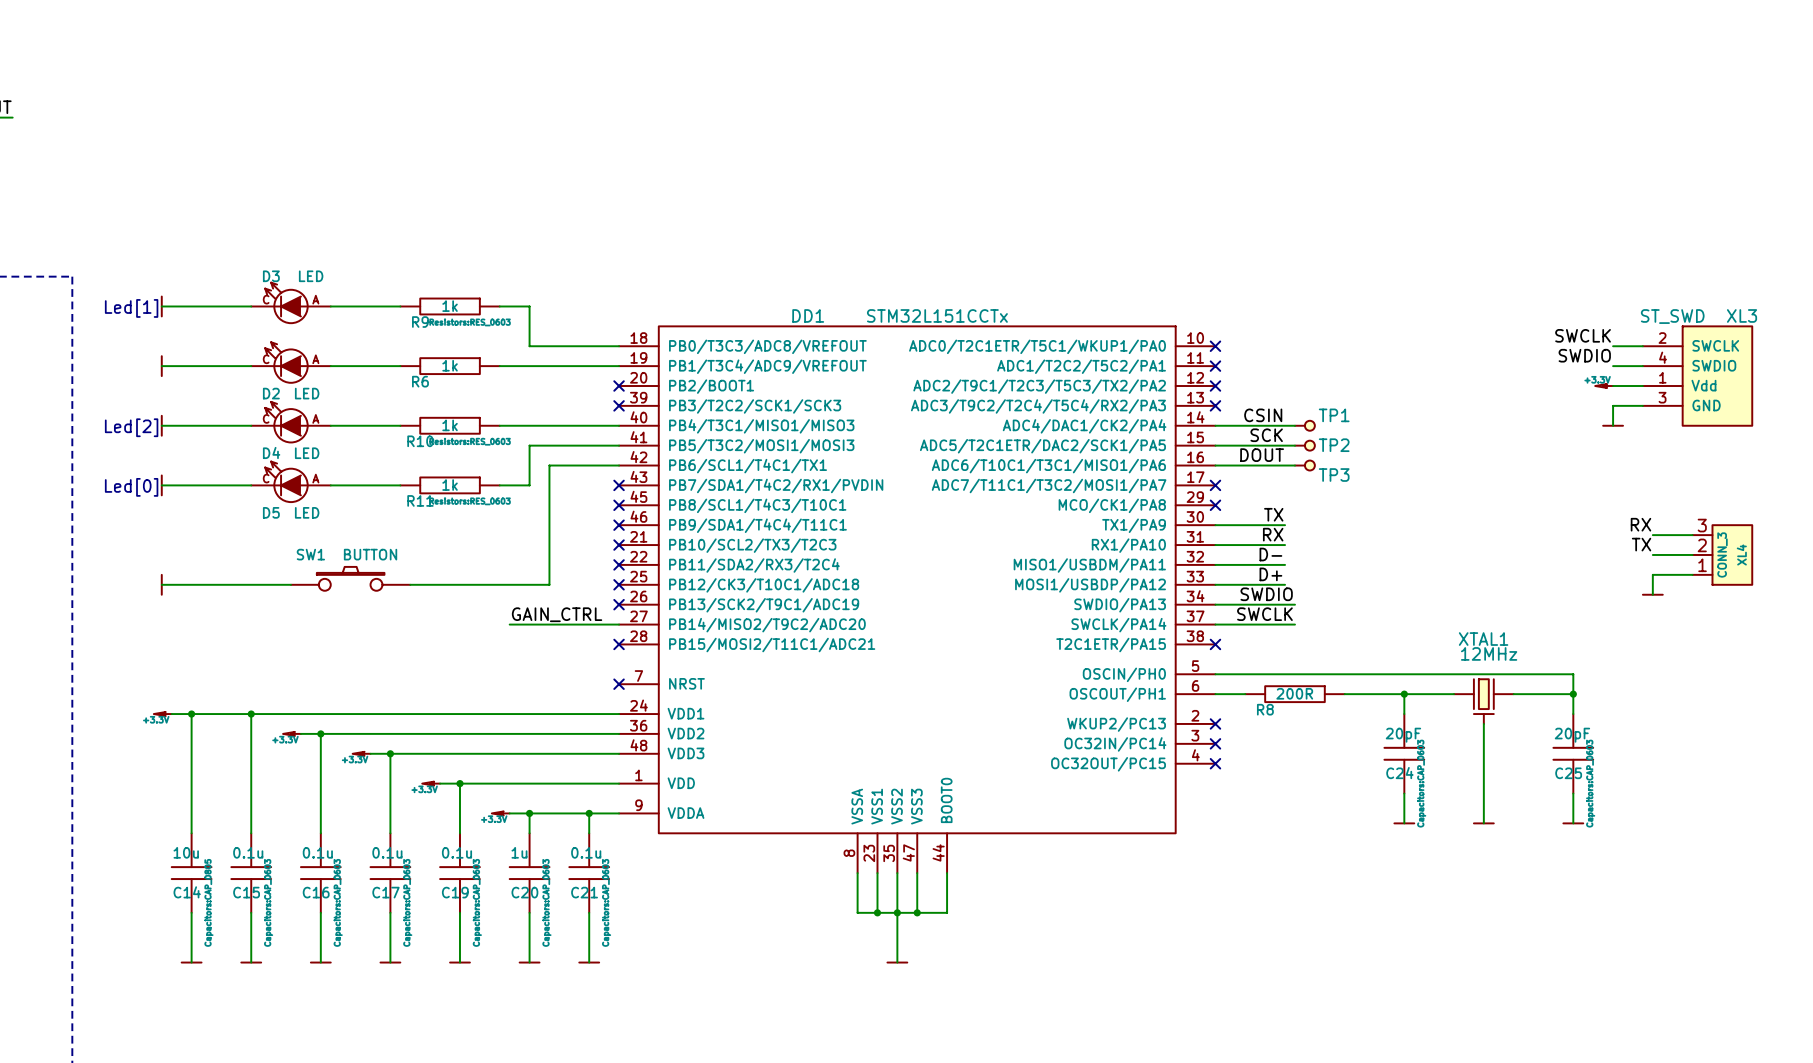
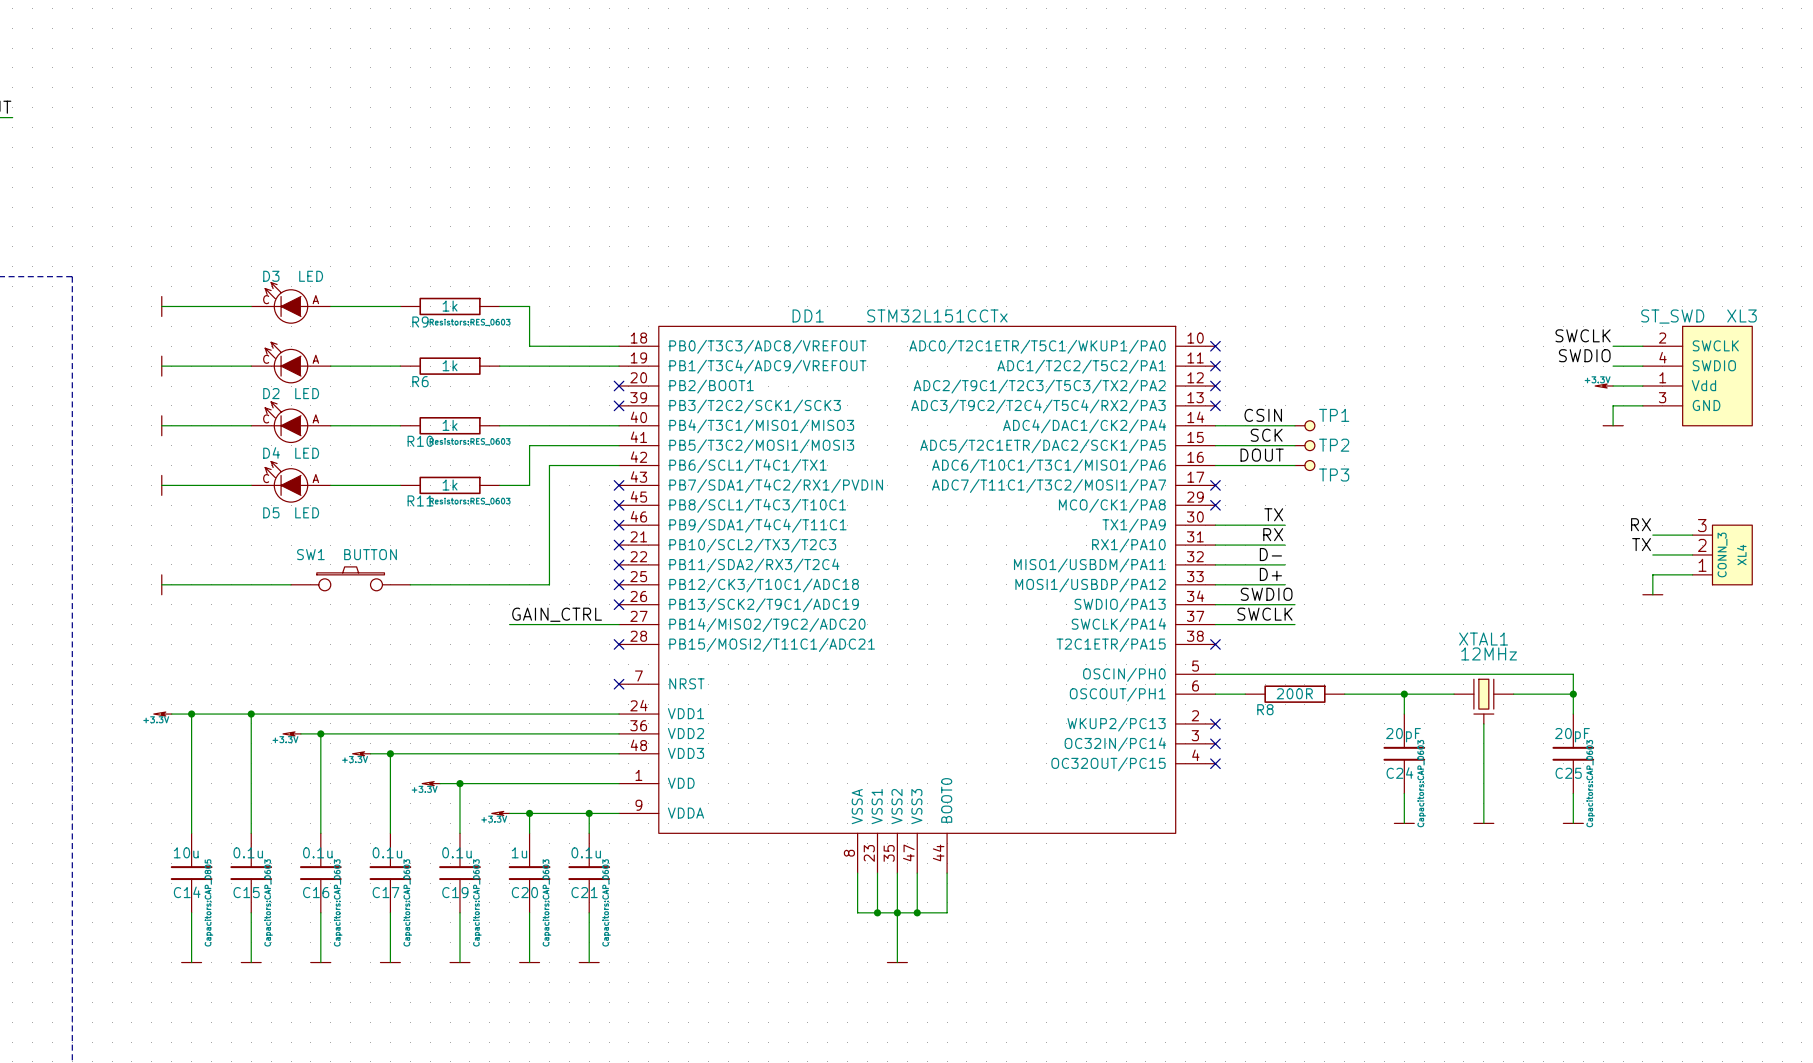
text: Led[1] (131, 308) -> none
text: Led[2] (131, 427) -> none
text: Led[0] (131, 487) -> none

